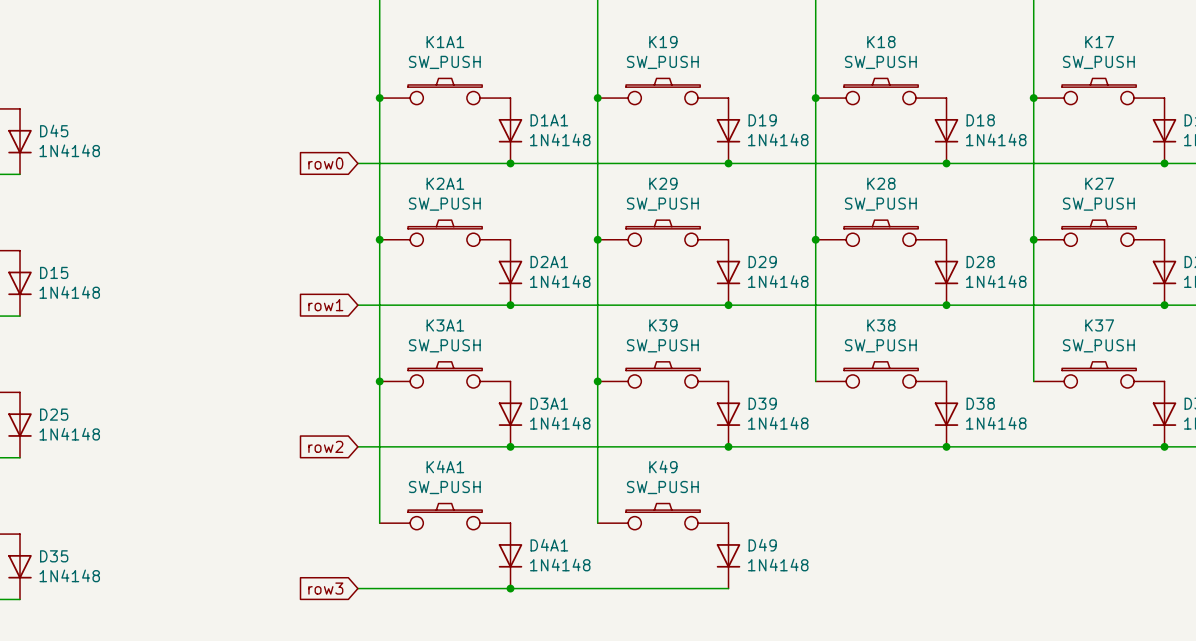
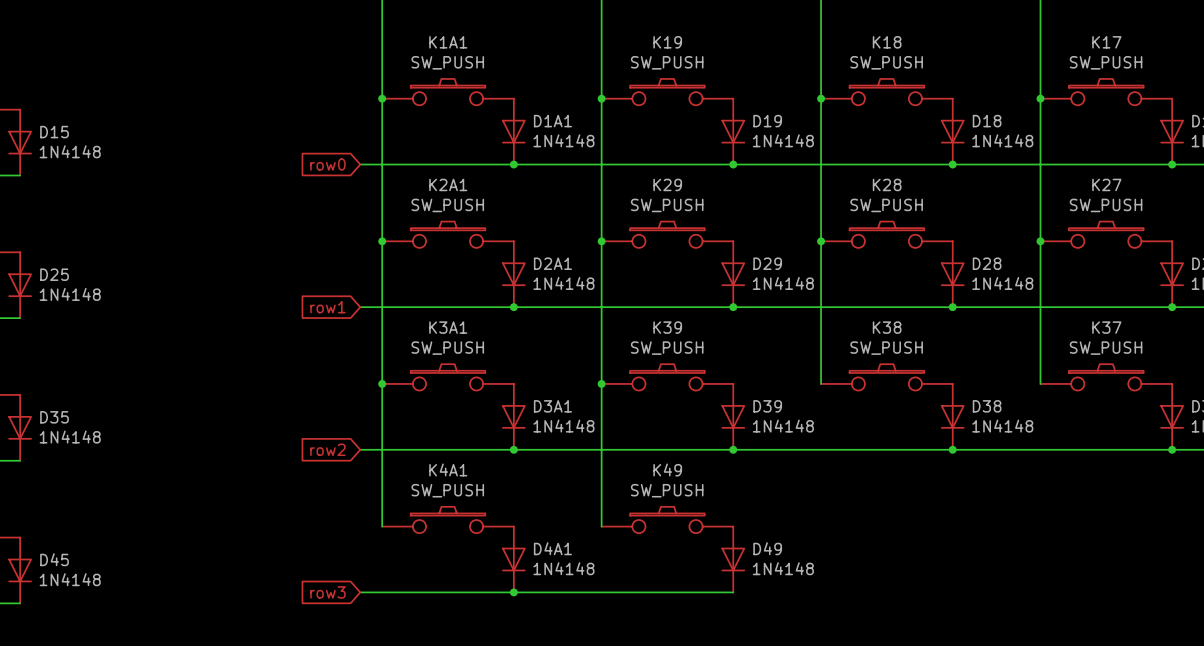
D45 name: D45 (54, 130) -> D15 (54, 132)
D15 name: D15 (54, 272) -> D25 (54, 274)
D25 name: D25 (54, 414) -> D35 (54, 417)
D35 name: D35 (54, 556) -> D45 (54, 559)

